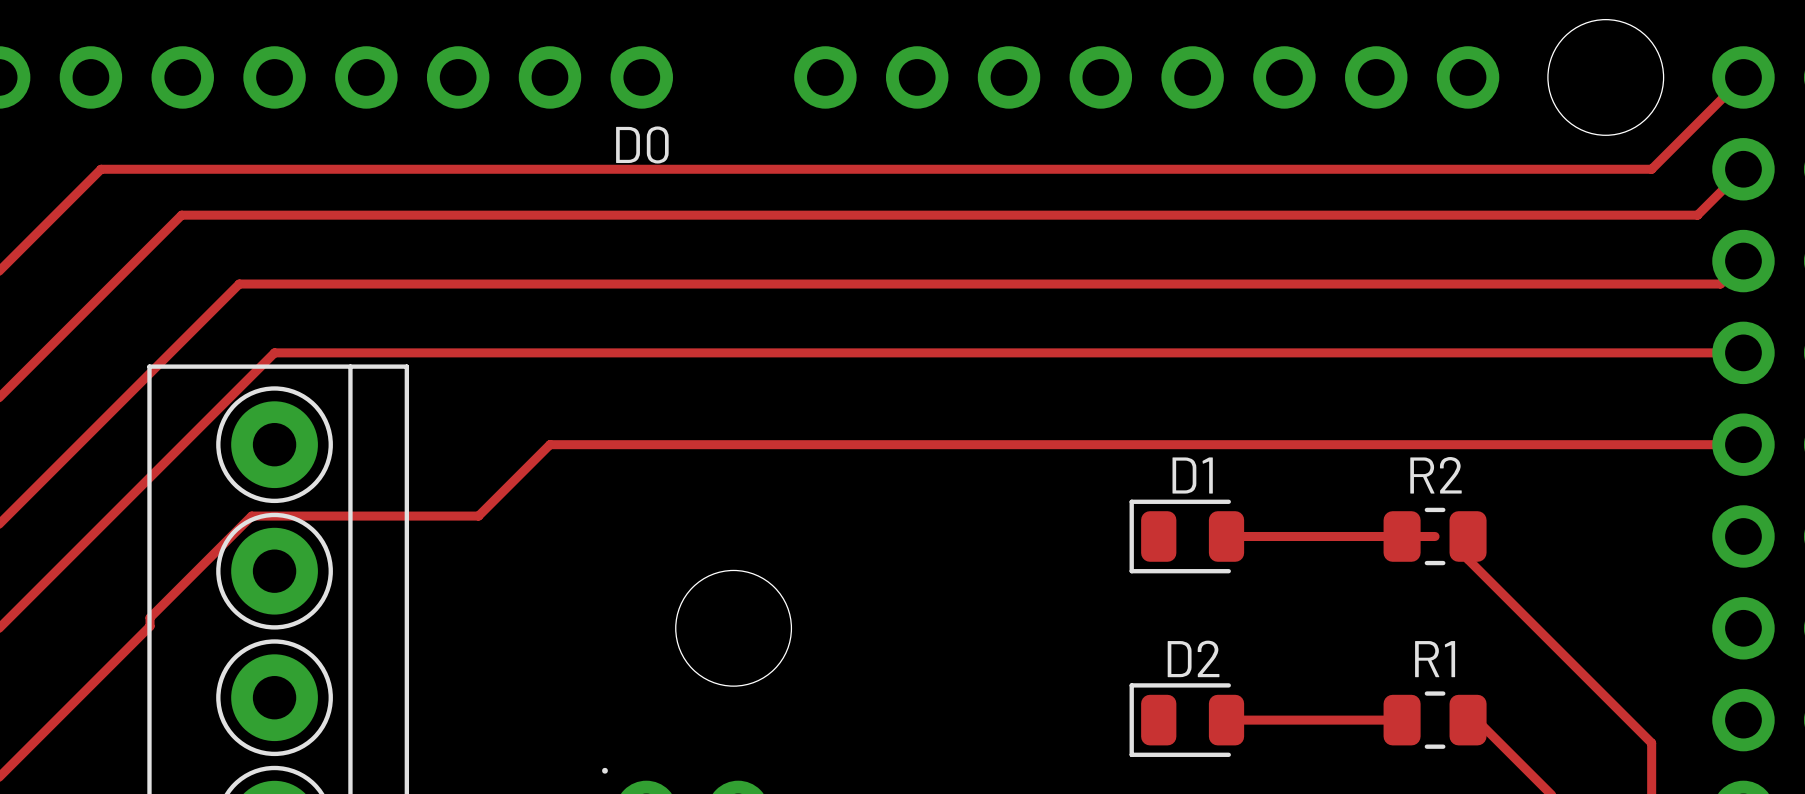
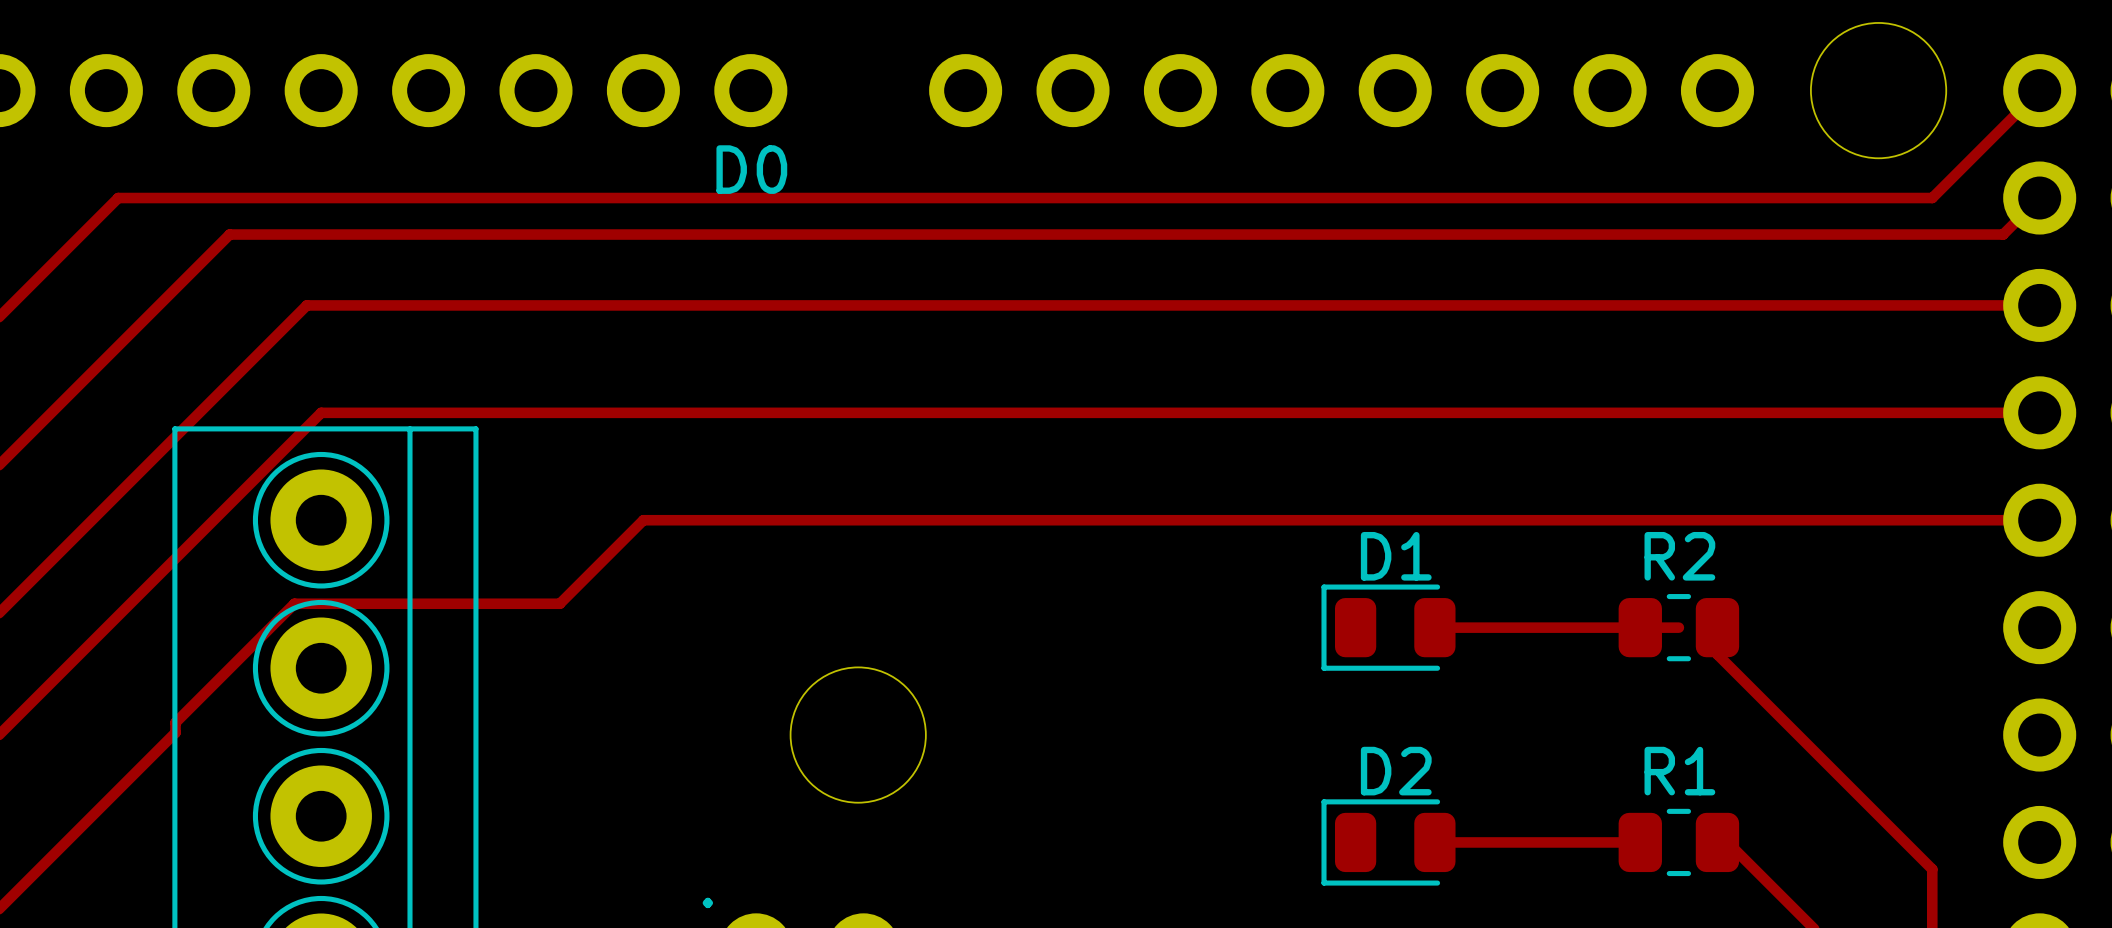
track: (1712, 200) (1697, 215) (181, 215) -> (2003, 234) (229, 234) (212, 251)
track: (1743, 261) (1720, 284) (239, 284) -> (2039, 305) (306, 305) (279, 332)

